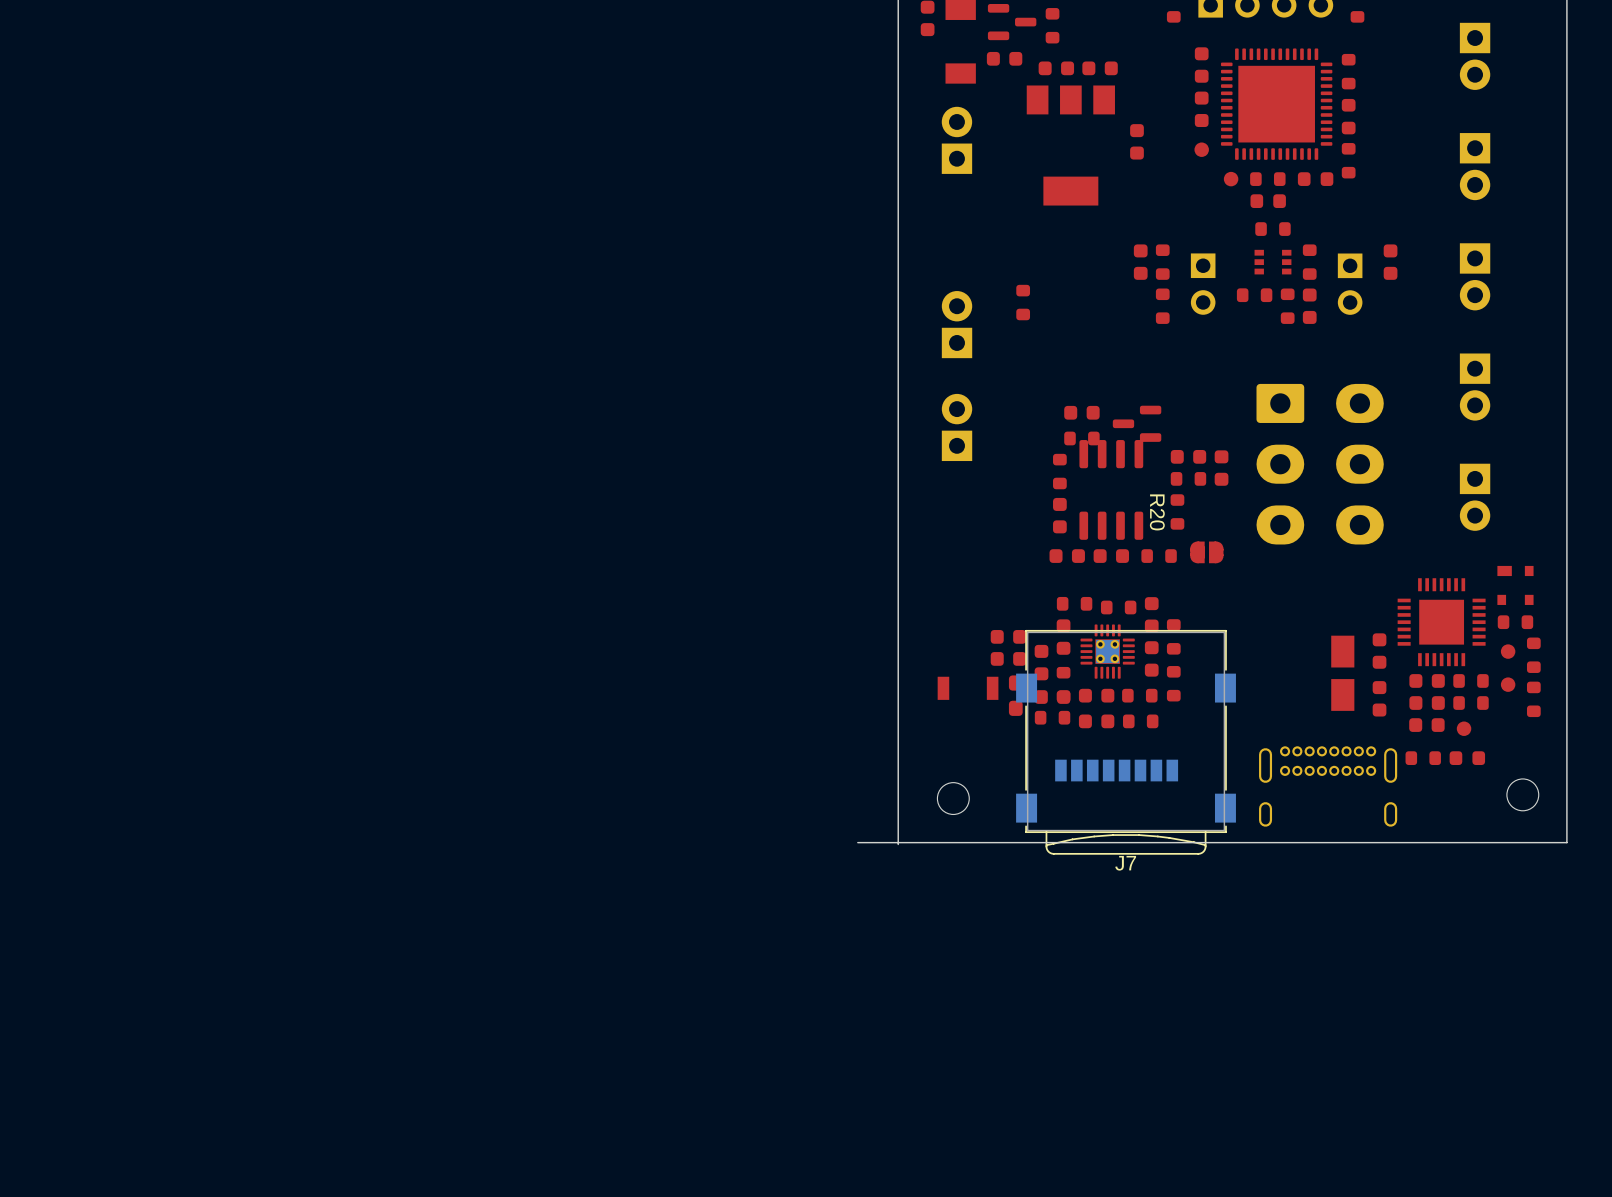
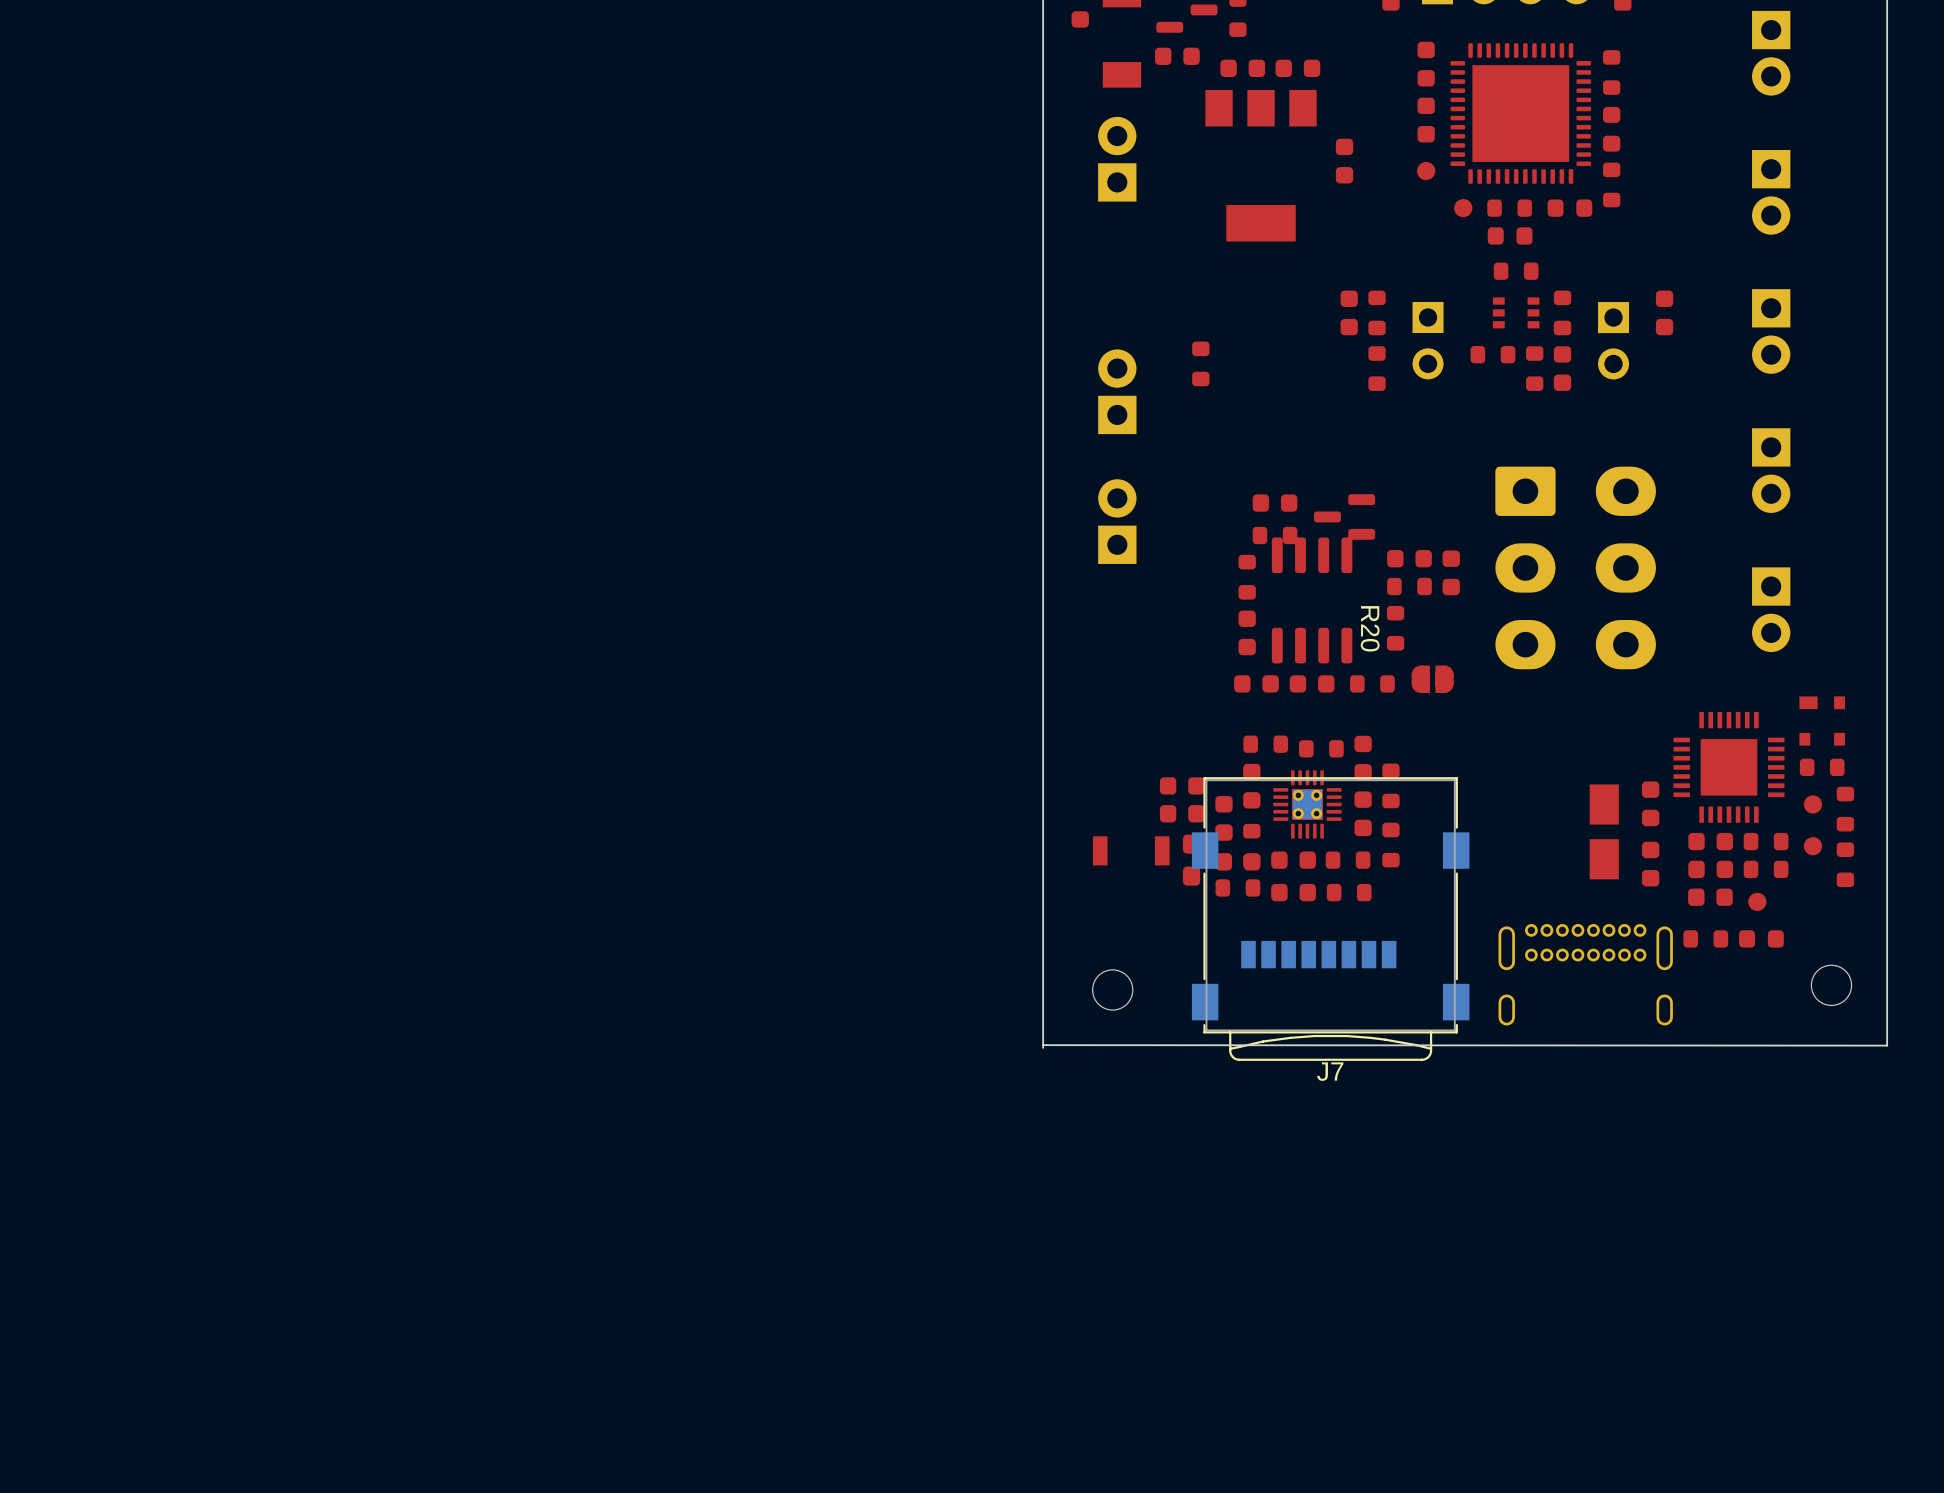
board edge: (1566, 842) (857, 842) -> (1887, 1045) (1043, 1045)

